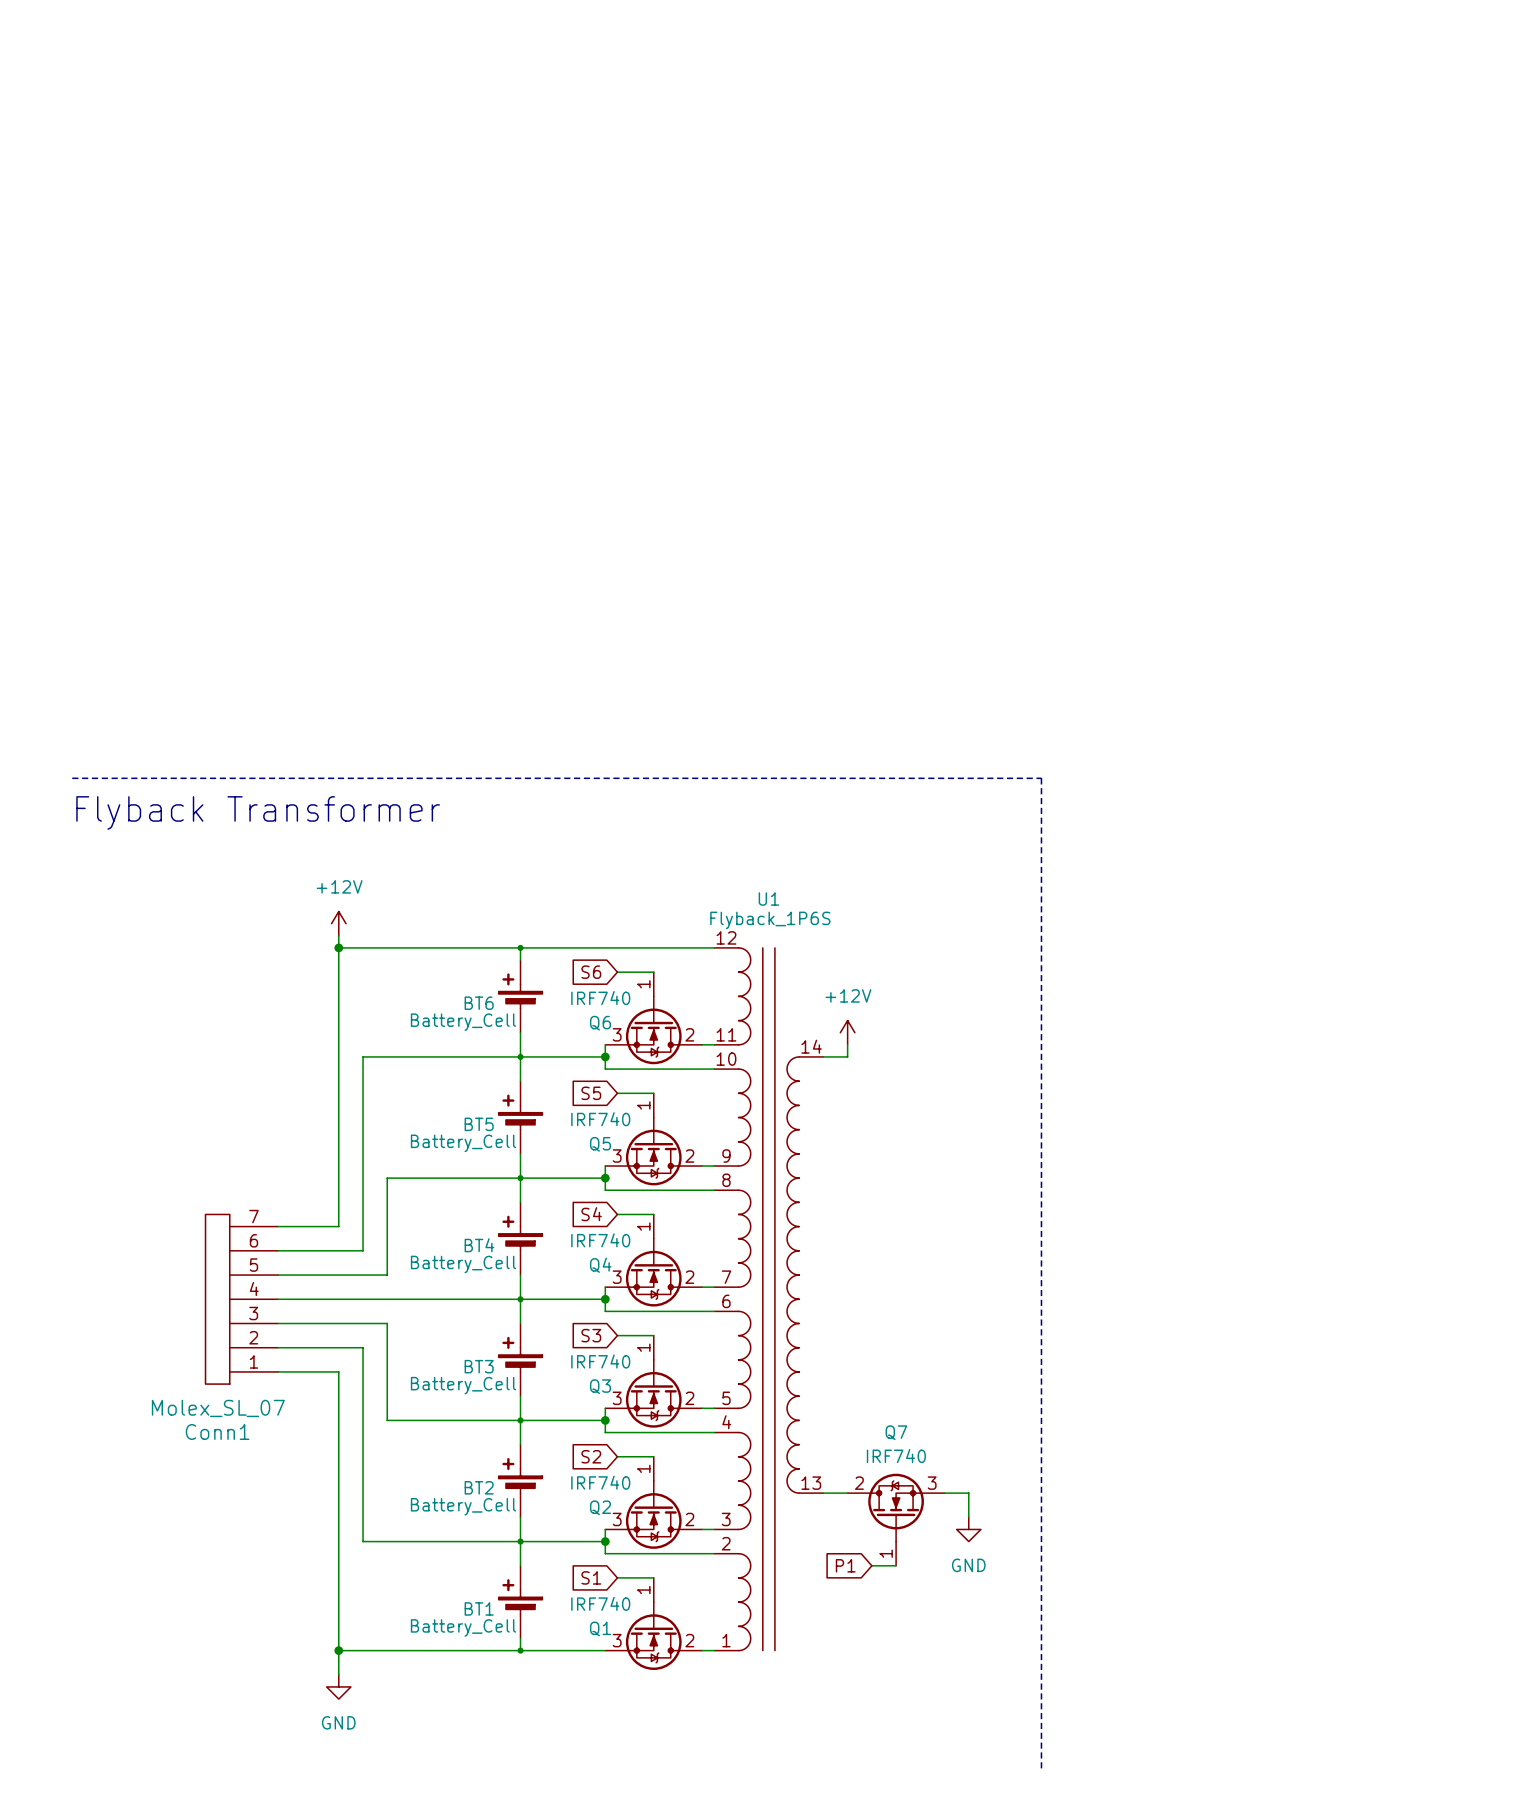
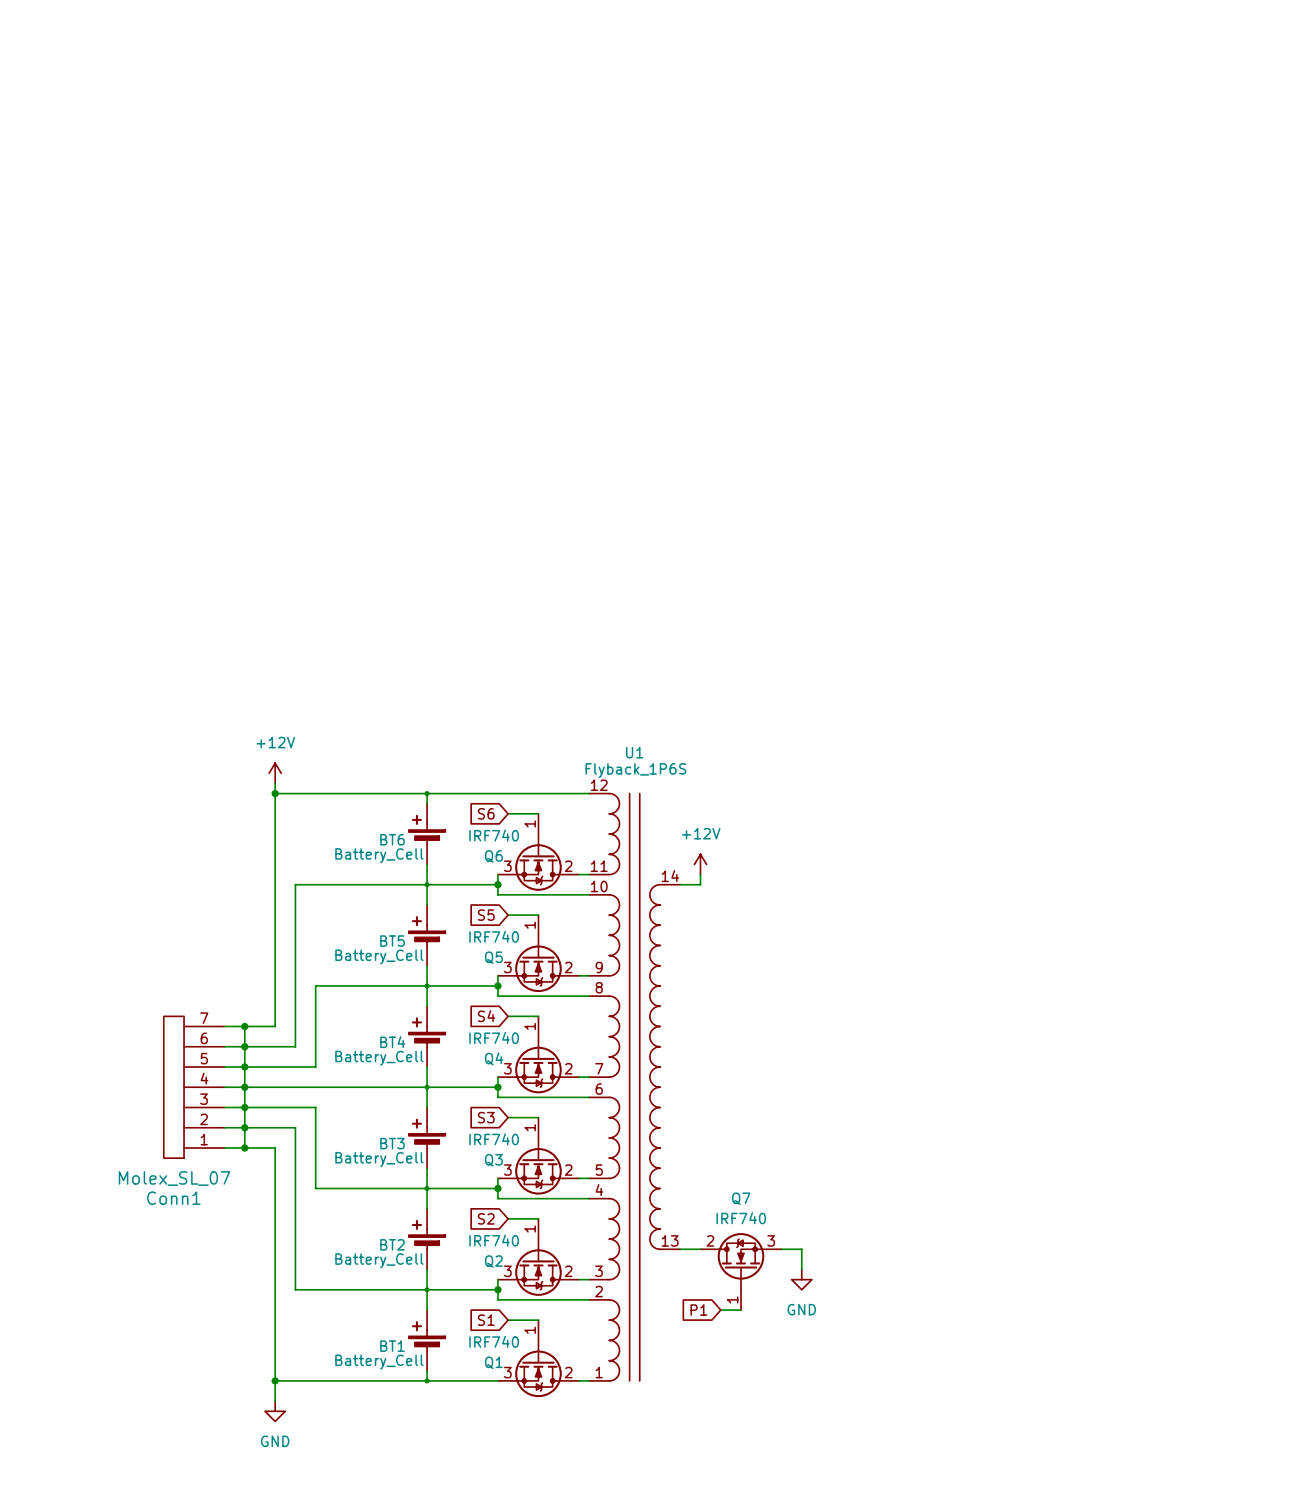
line: (72, 778) (1041, 778) (1041, 1771) -> none
text: Flyback Transformer (258, 812) -> none
wire: none -> (244, 1026) (244, 1148)
junction: none -> (244, 1026)
junction: none -> (244, 1046)
junction: none -> (244, 1066)
junction: none -> (244, 1087)
junction: none -> (244, 1107)
junction: none -> (244, 1127)
junction: none -> (244, 1148)

